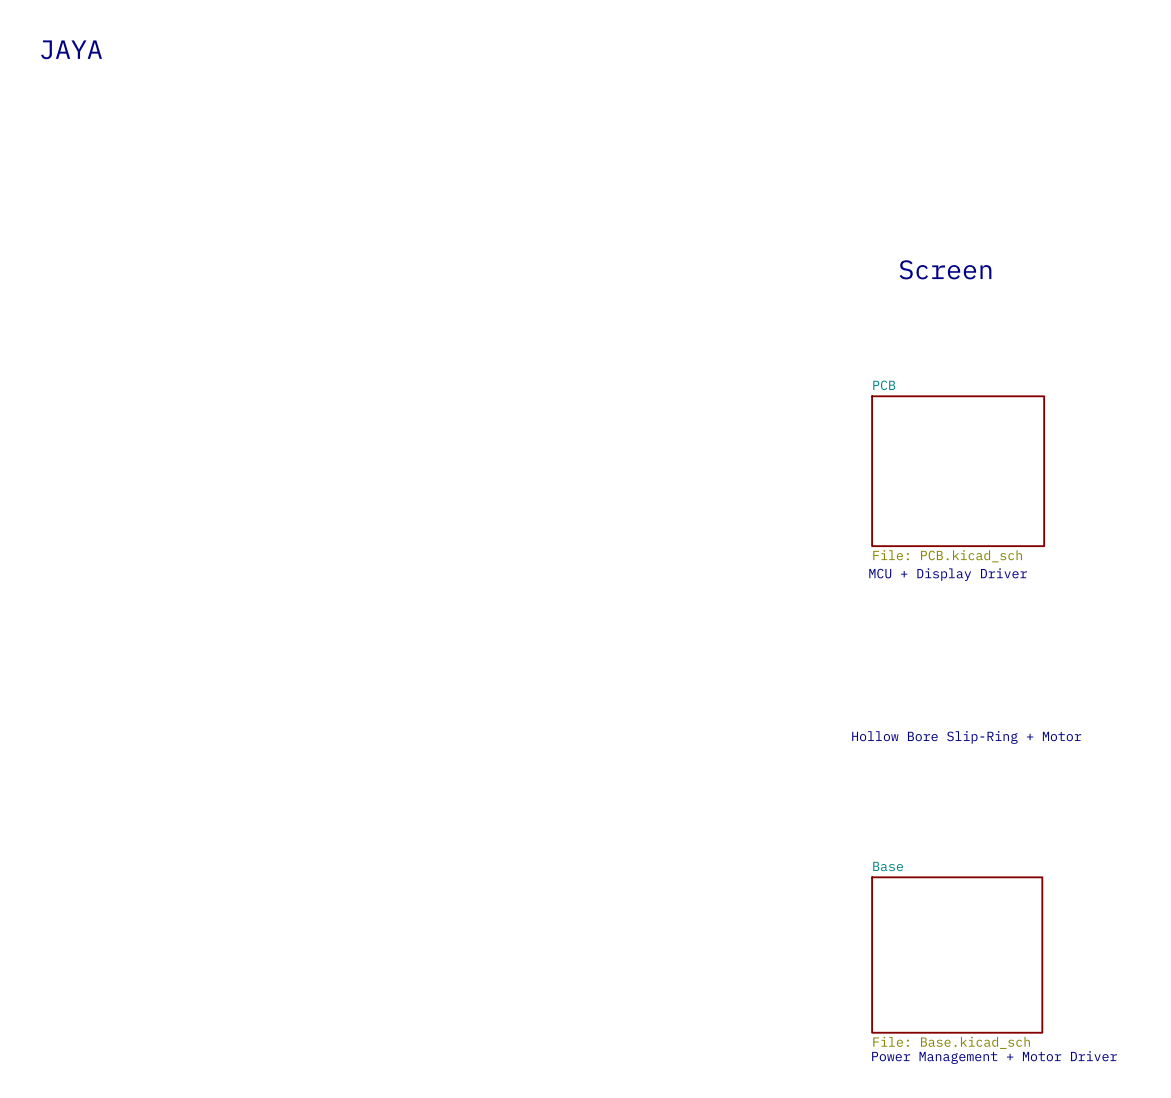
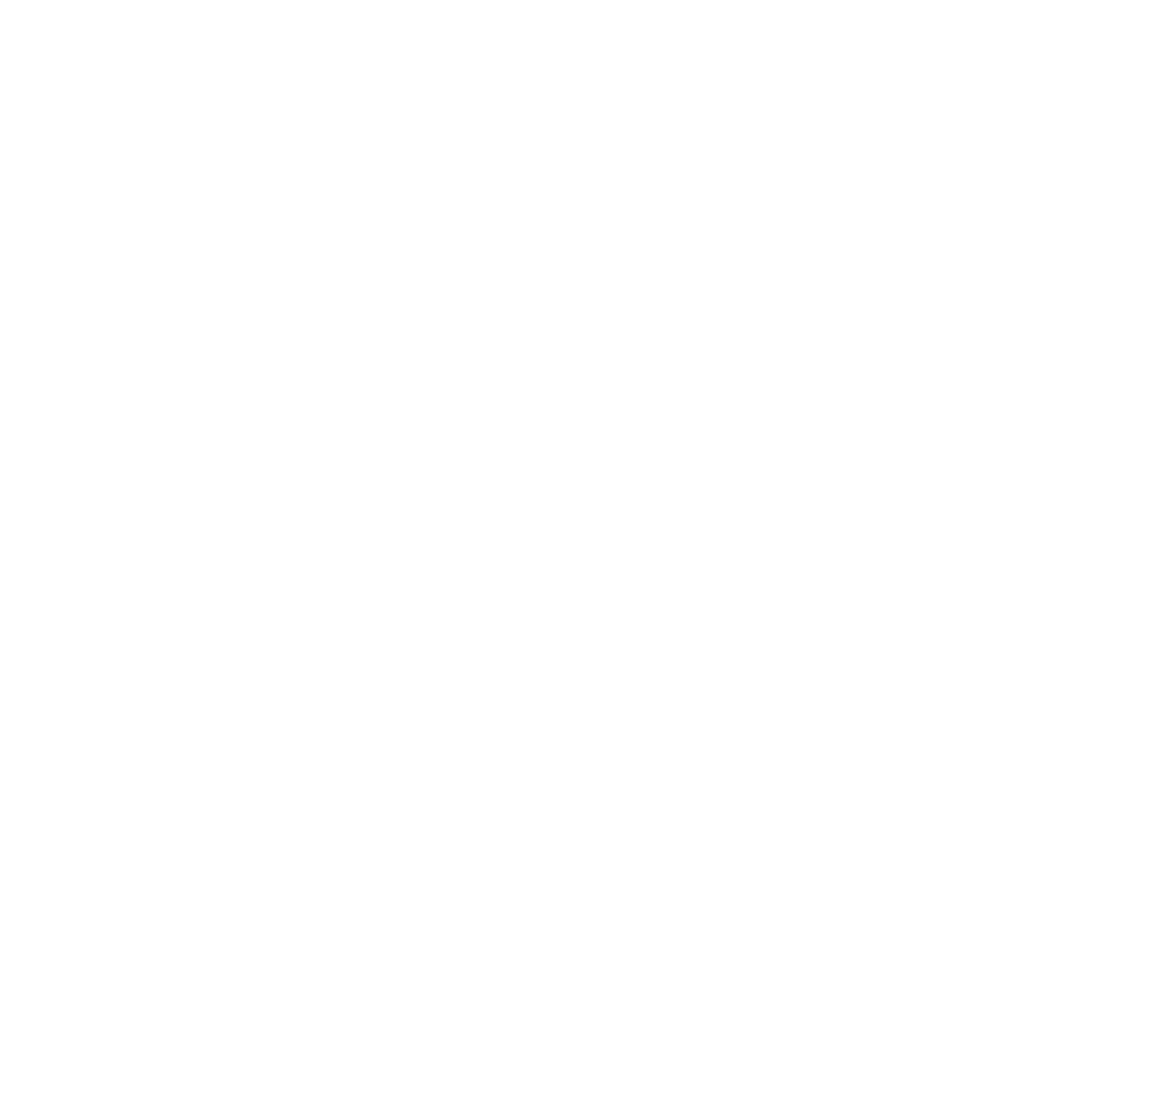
text: JAYA (71, 49) -> none
text: Screen (945, 269) -> none
sheet PCB: File: PCB.kicad_sch (958, 471) -> none
text: MCU + Display Driver (948, 574) -> none
text: Hollow Bore Slip-Ring + Motor (966, 737) -> none
sheet Base: File: Base.kicad_sch (957, 955) -> none
text: Power Management + Motor Driver (994, 1057) -> none

